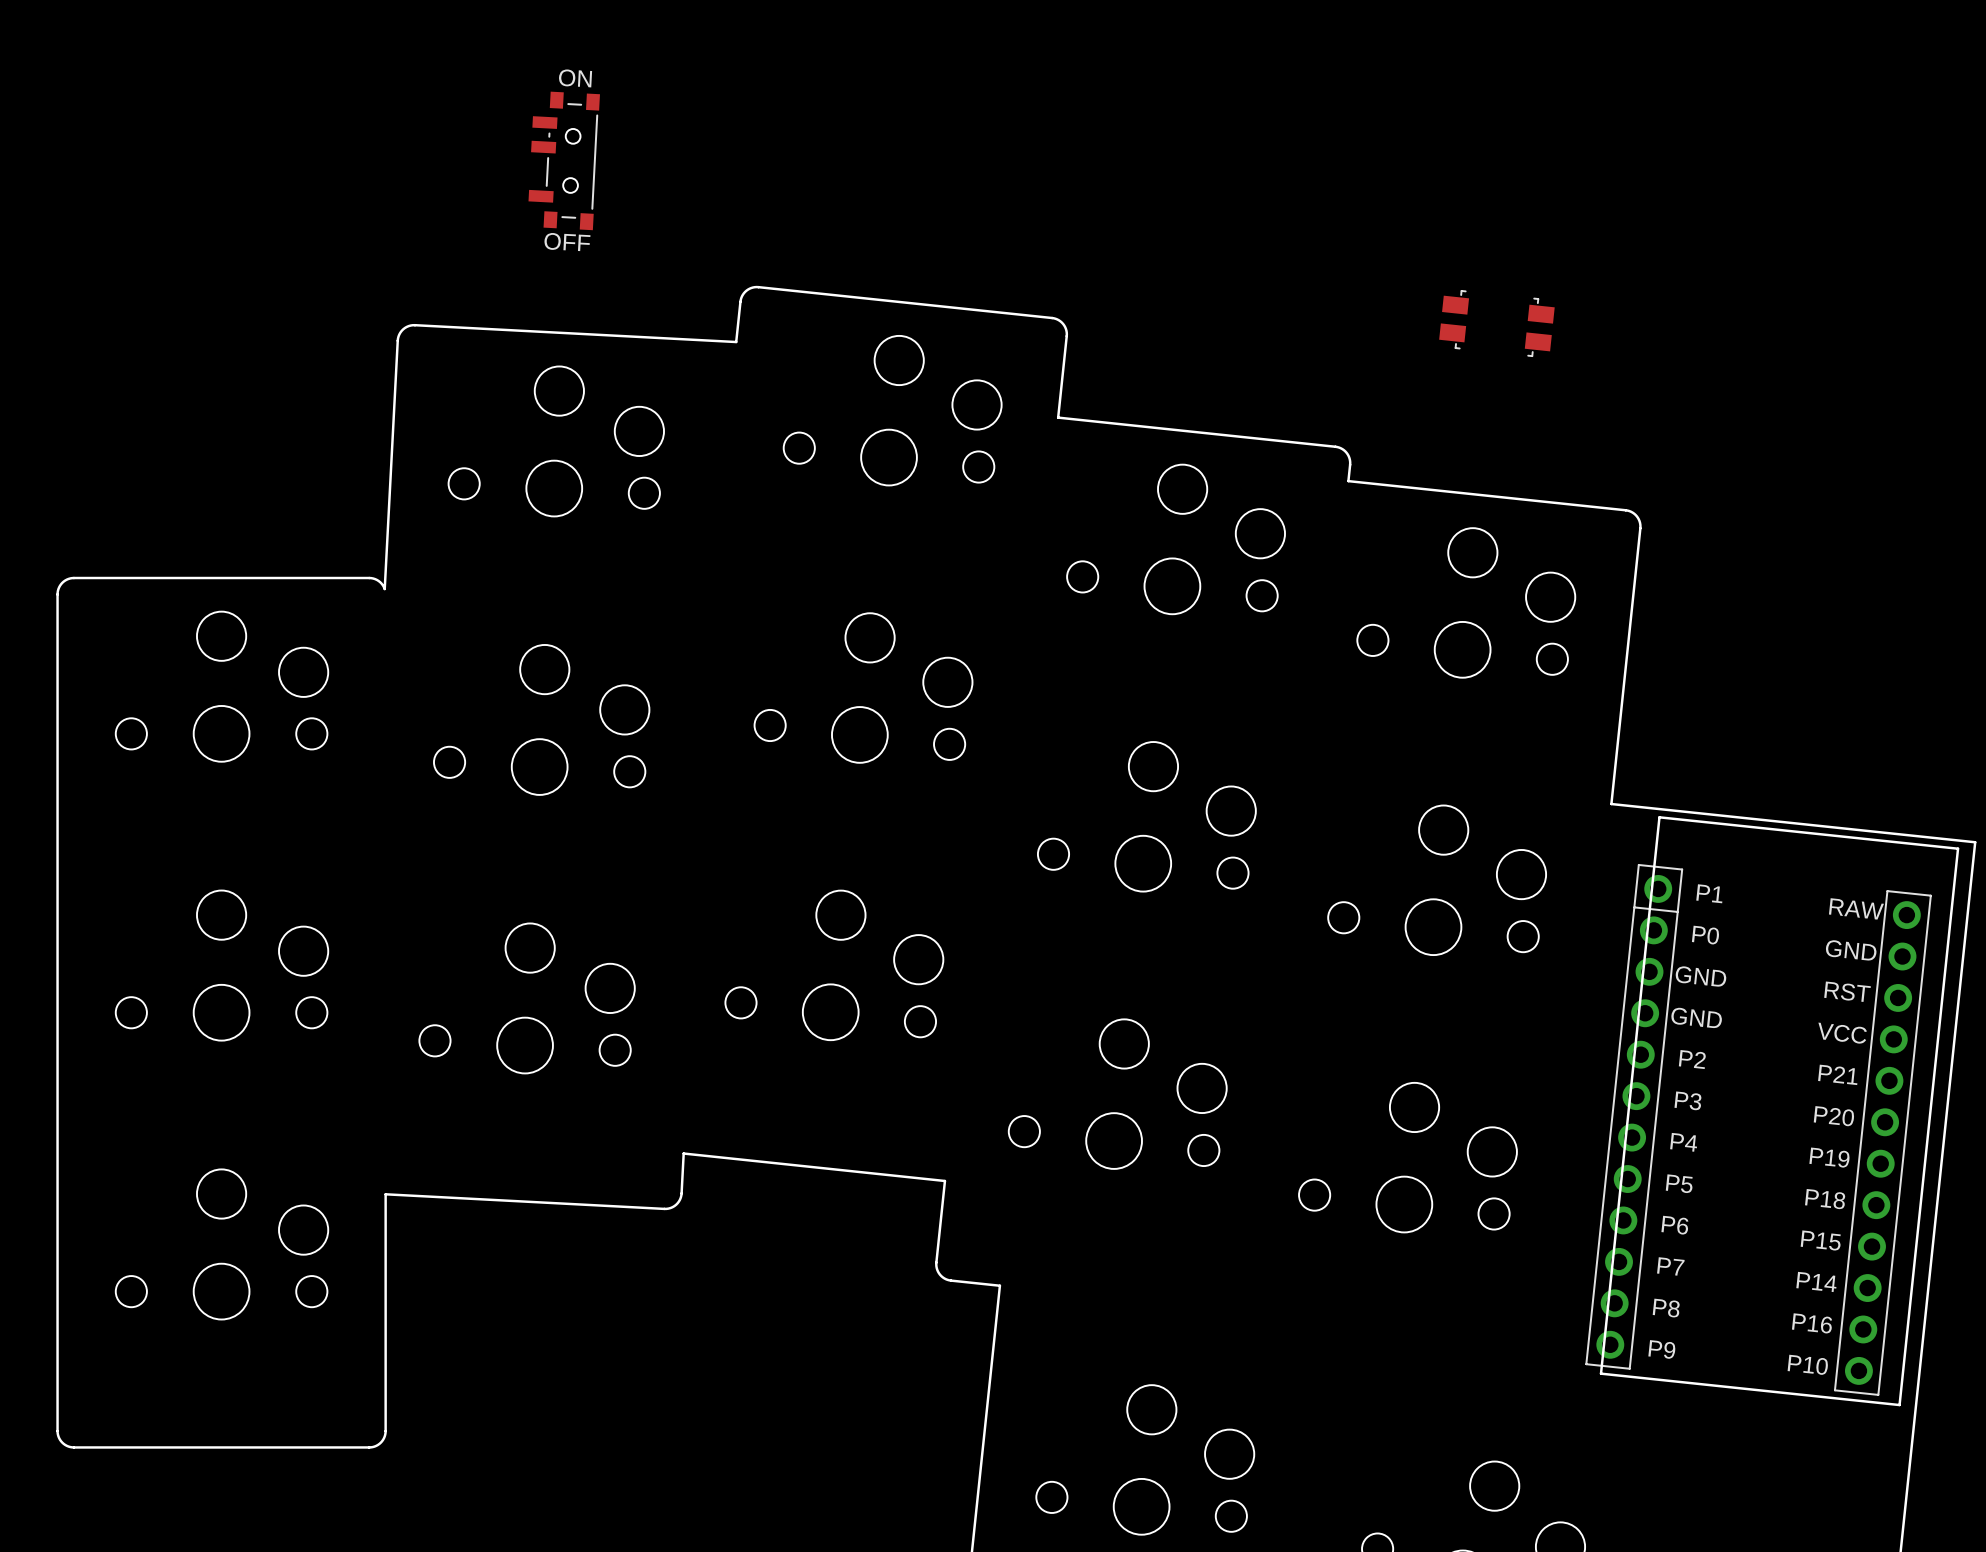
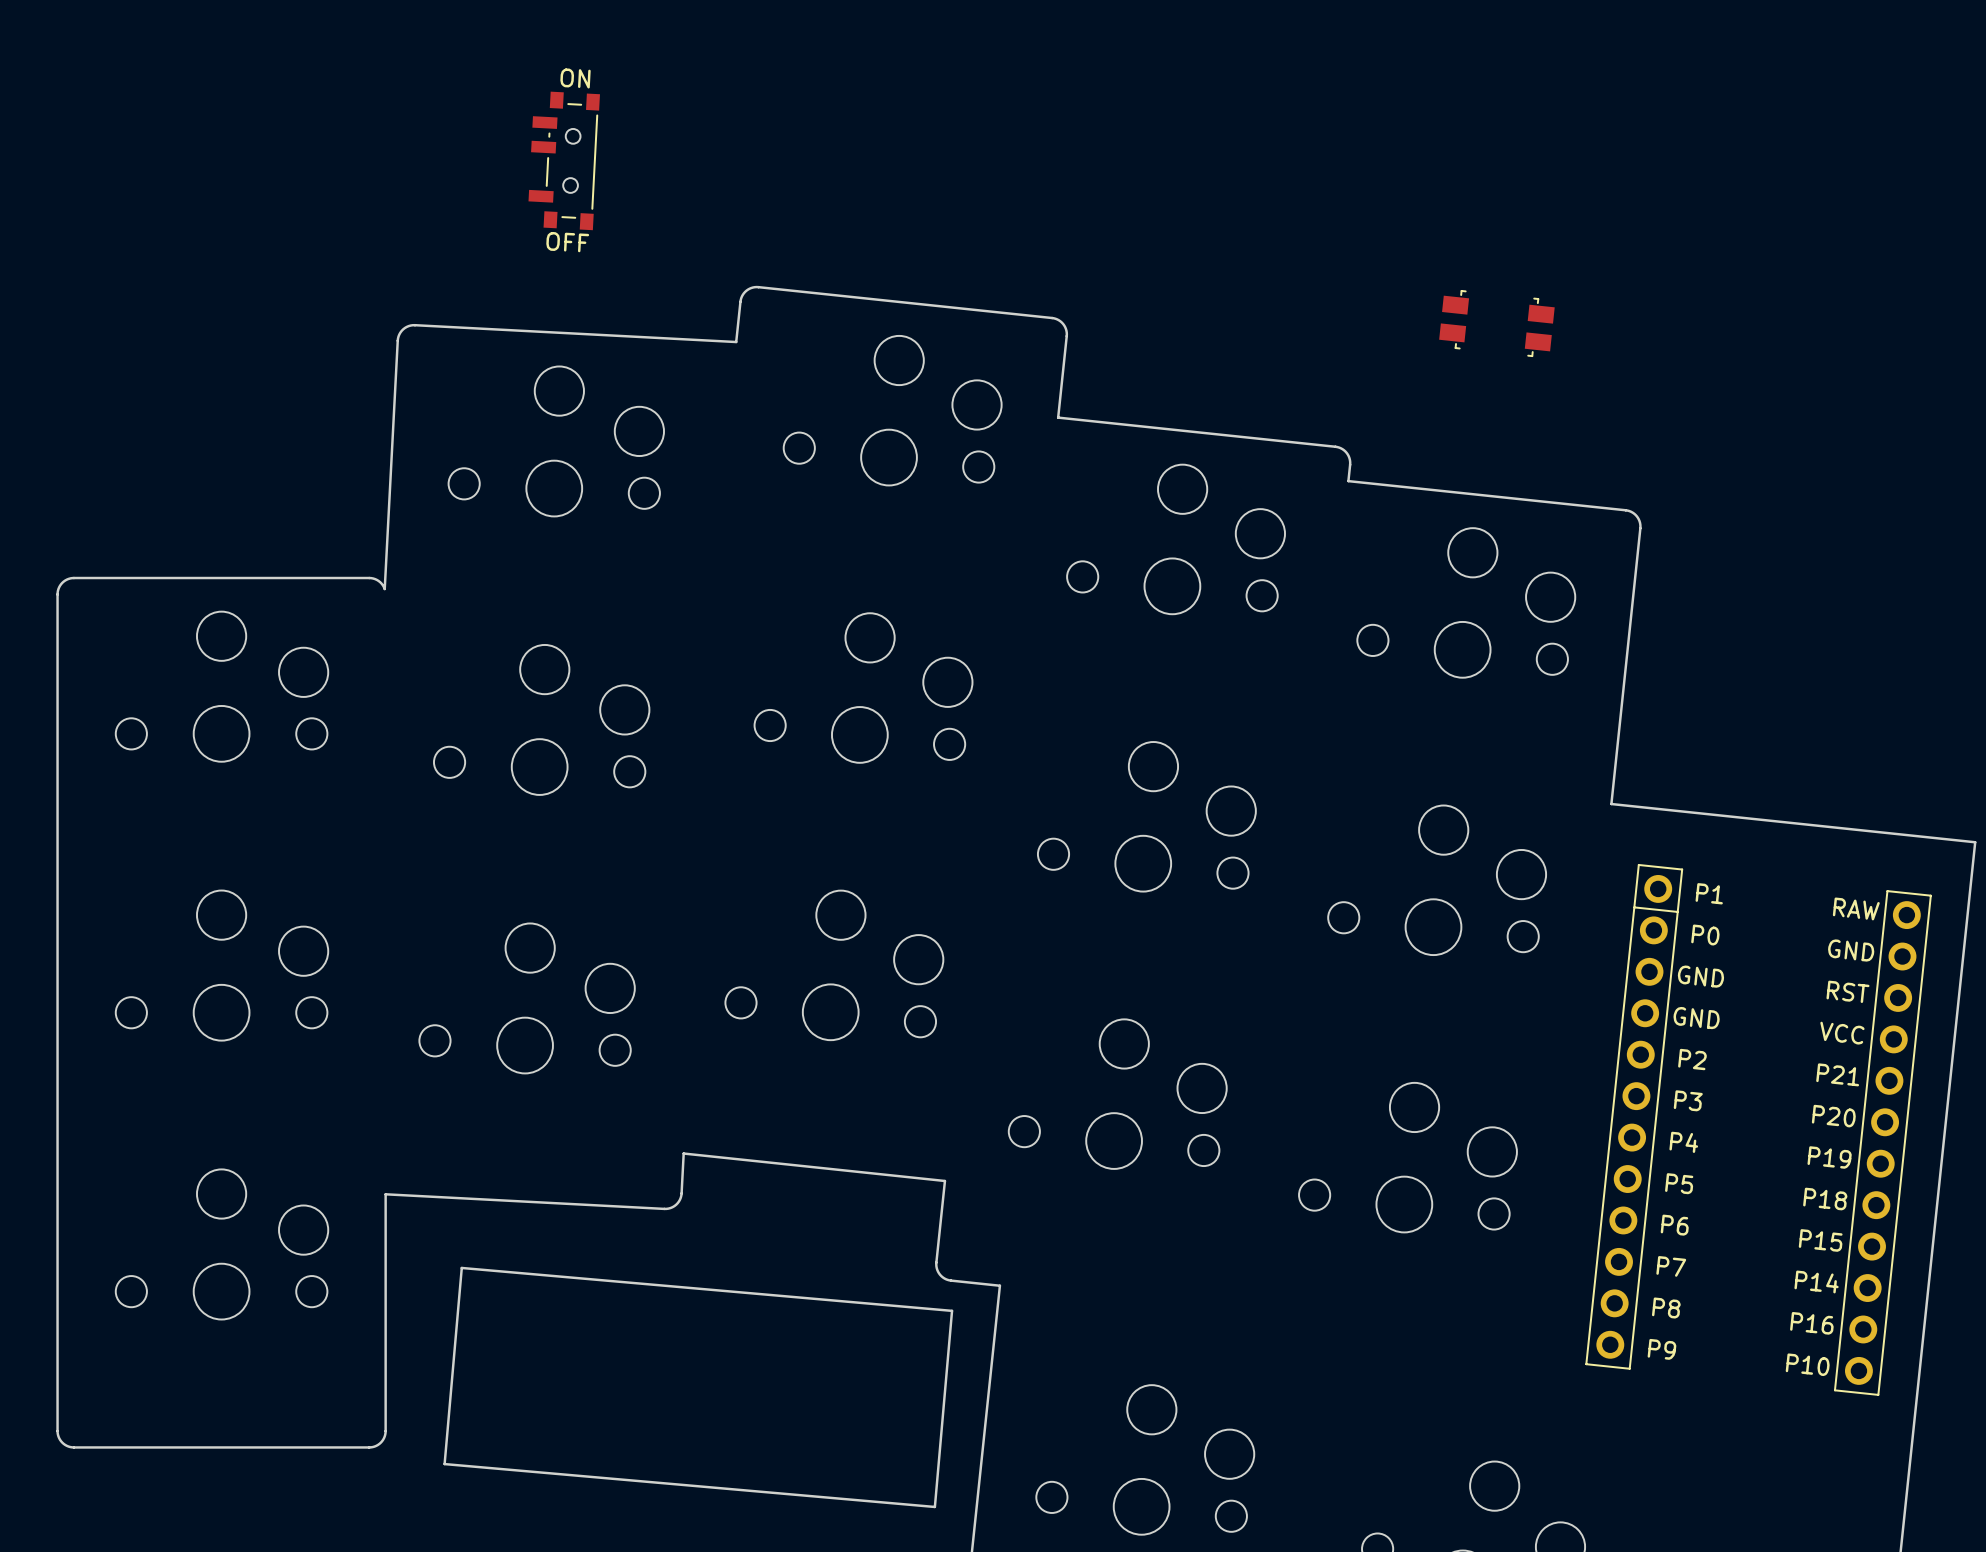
board edge: (1659, 817) (1601, 1373) (1899, 1405) (1958, 848) (1659, 817) -> none
board edge: none -> (461, 1267) (444, 1464) (934, 1506) (952, 1310) (461, 1267)

